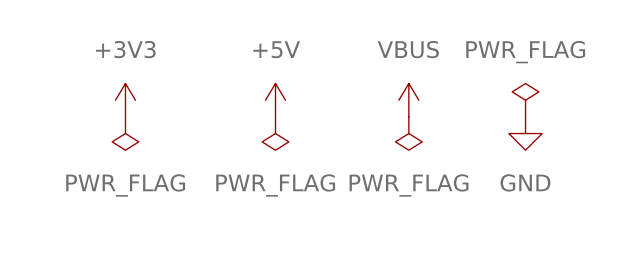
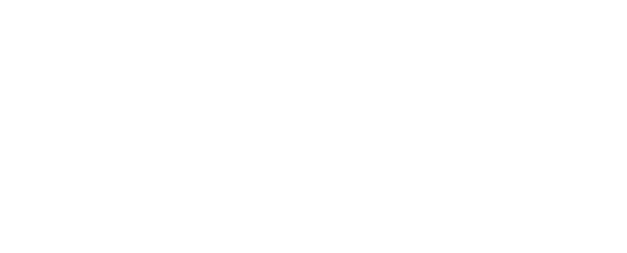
power symbol: +3V3 (125, 100) -> none
power symbol: +5V (275, 100) -> none
power symbol: VBUS (408, 100) -> none
power symbol: PWR_FLAG (525, 100) -> none
power symbol: PWR_FLAG (125, 133) -> none
power symbol: PWR_FLAG (275, 133) -> none
power symbol: PWR_FLAG (408, 133) -> none
power symbol: GND (525, 133) -> none

